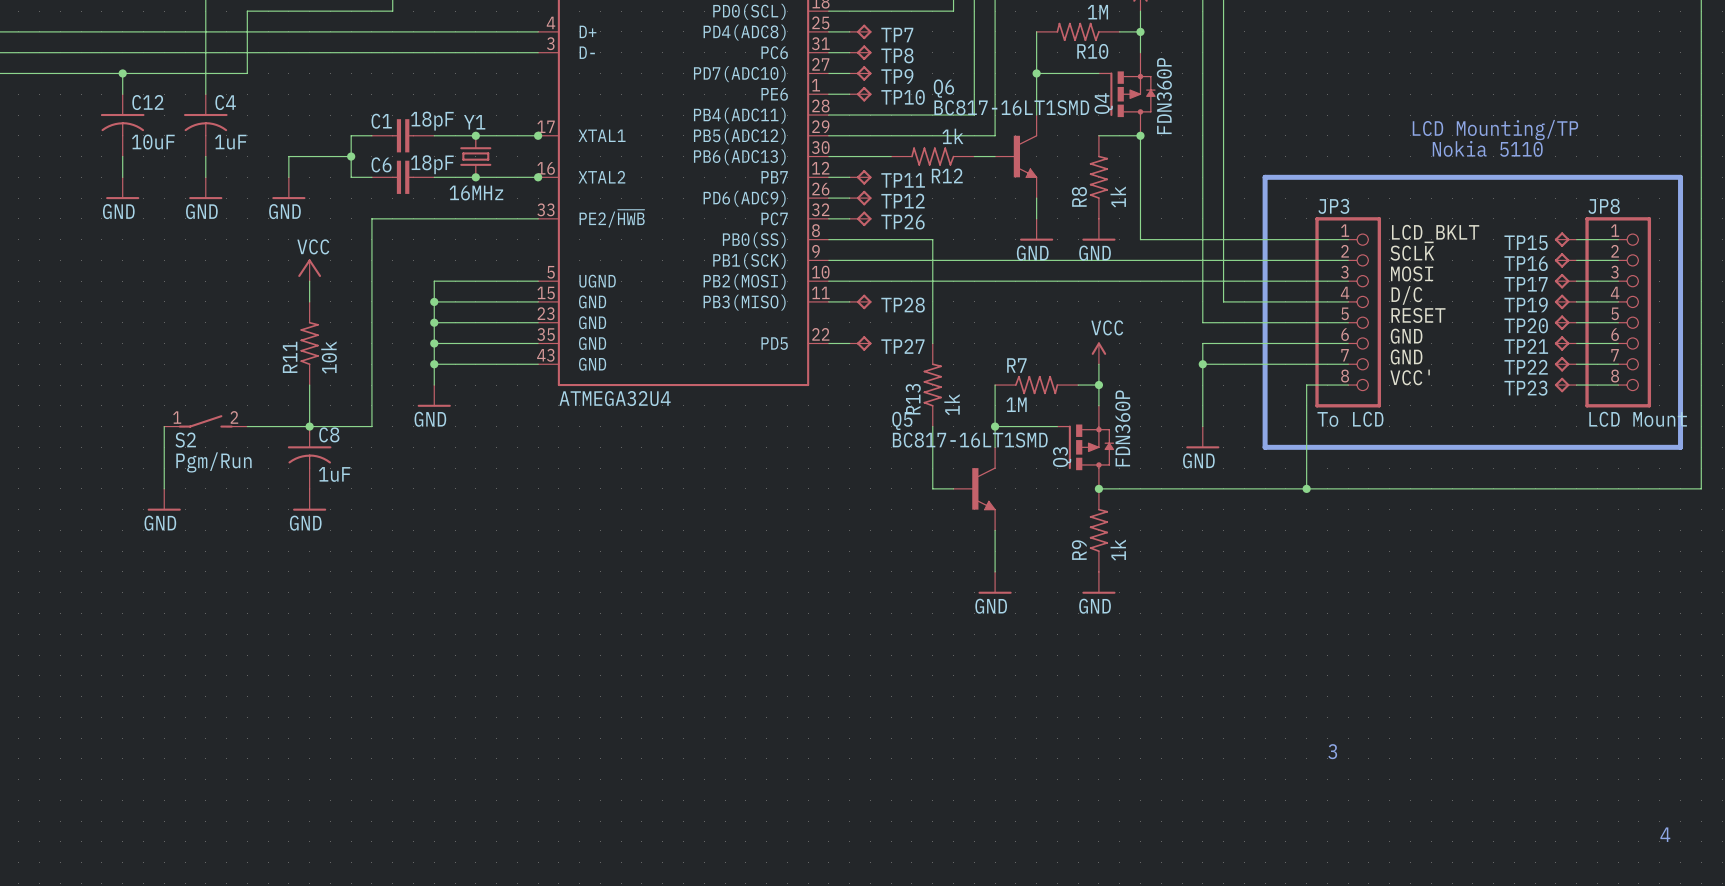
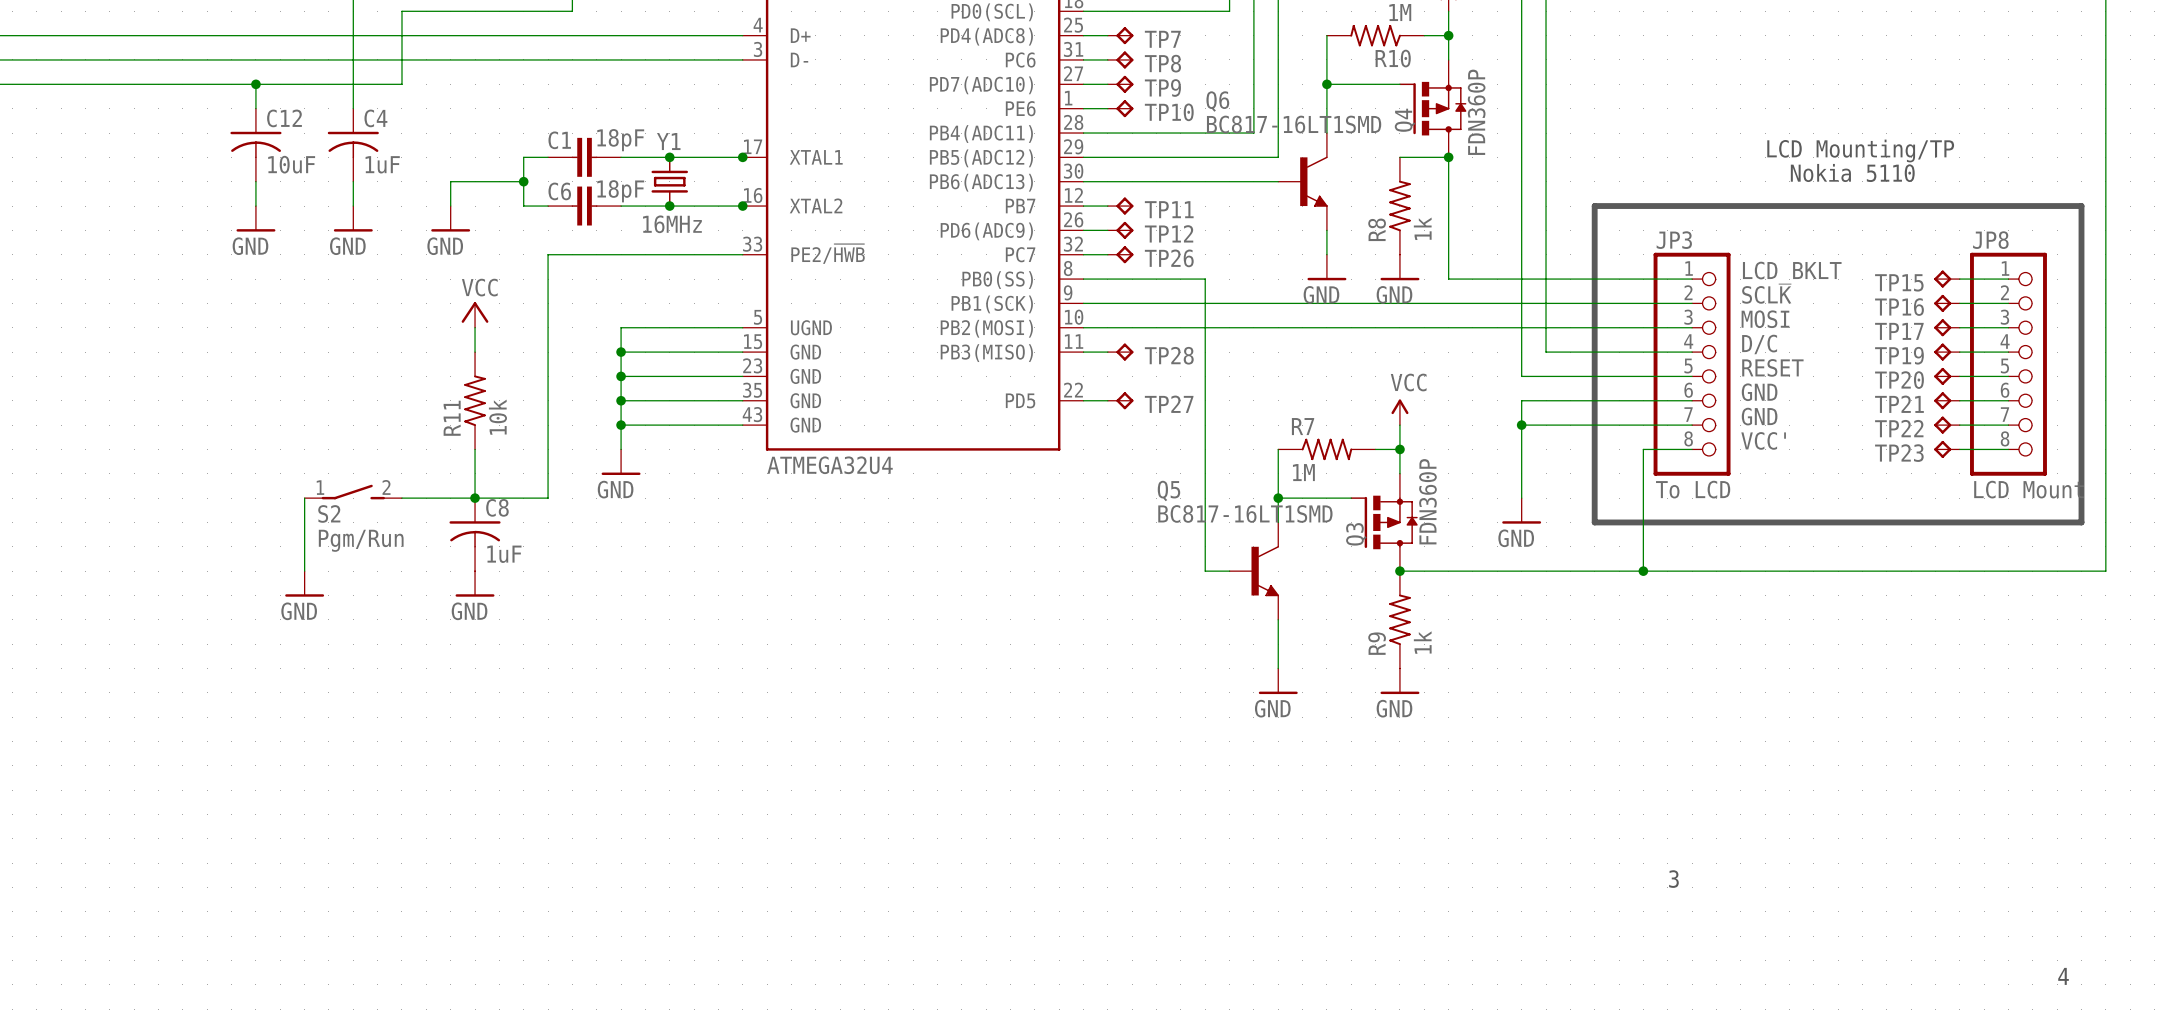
R12: 1k (932, 156) -> none
R13: 1k (932, 385) -> none

